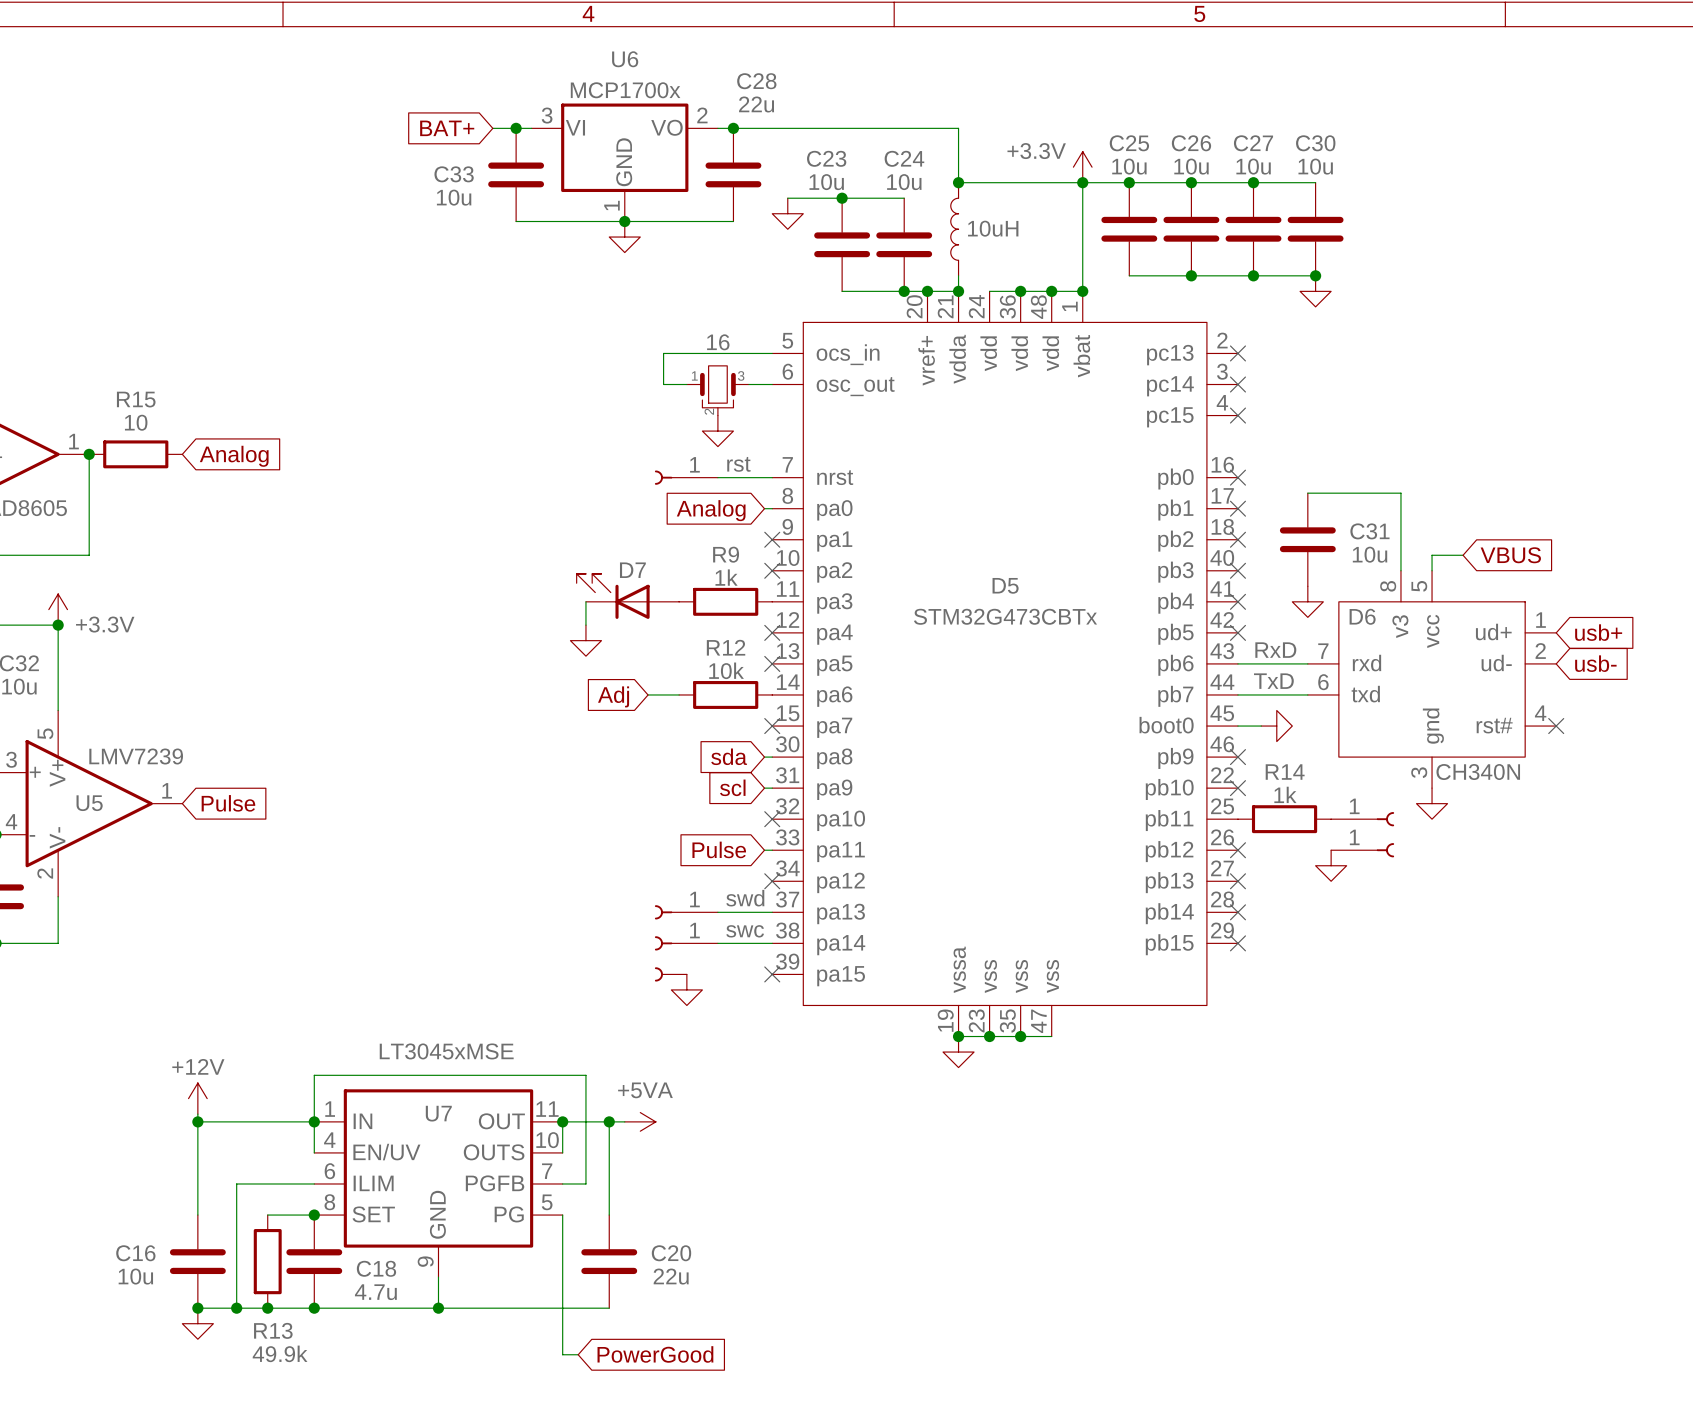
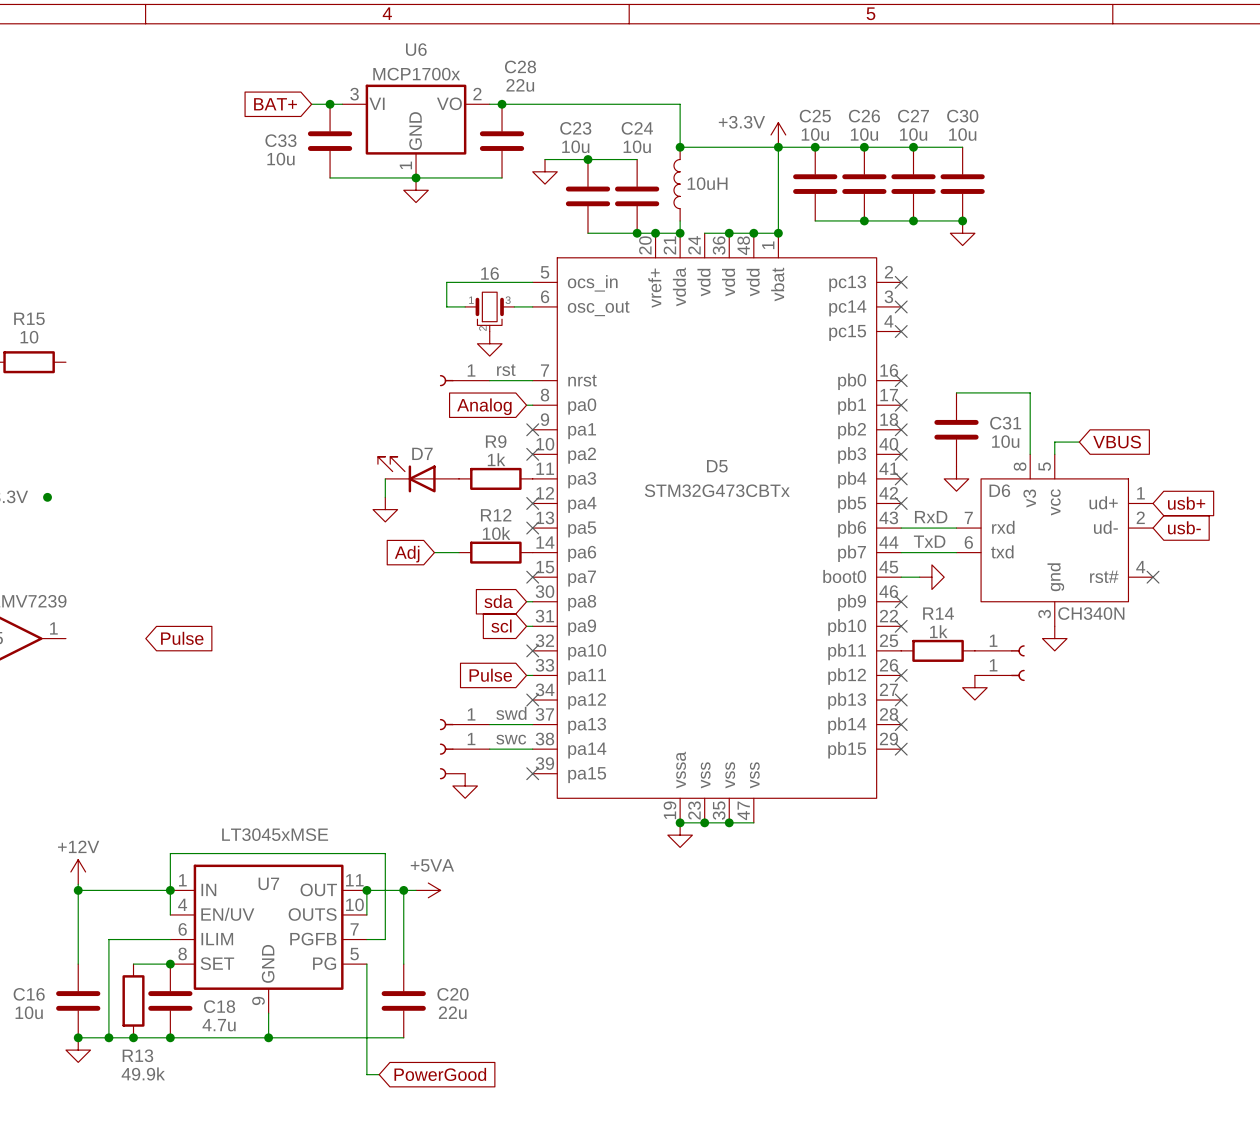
global label: Analog (234, 456) -> none
junction: none -> (47, 497)
global label position: Pulse (228, 803) -> Pulse (182, 638)

